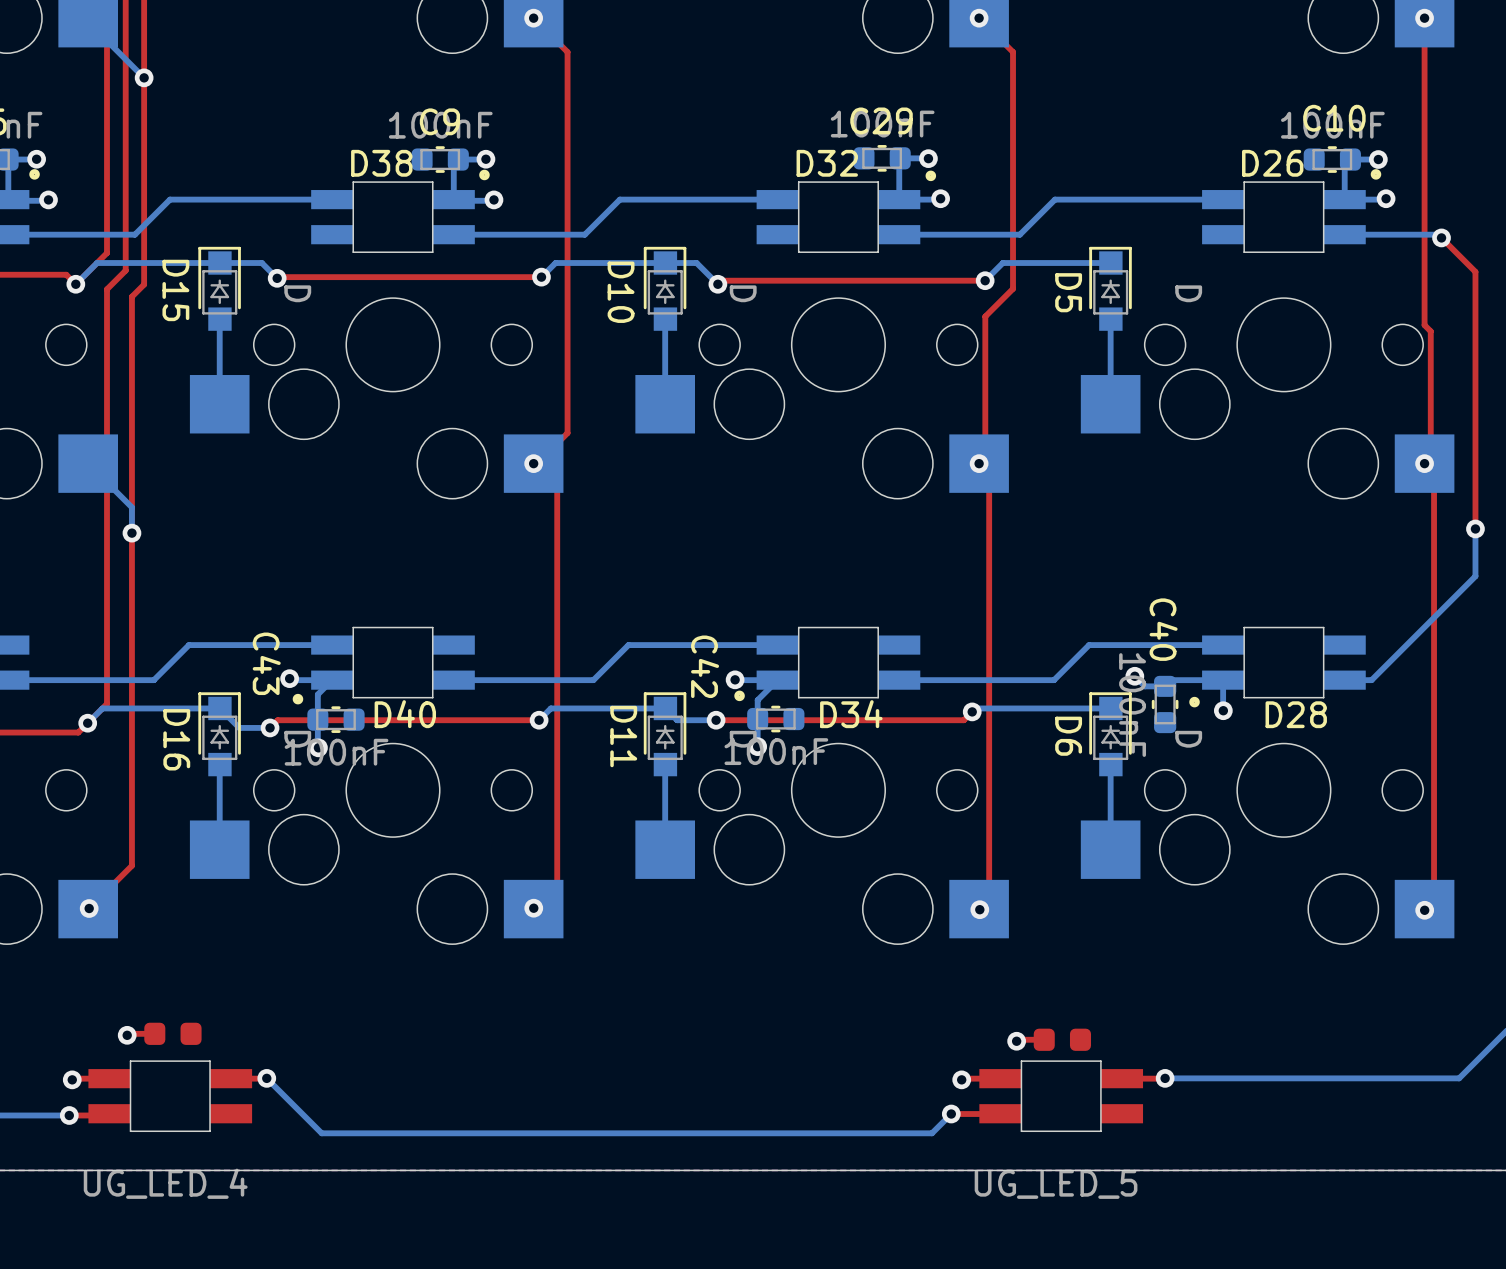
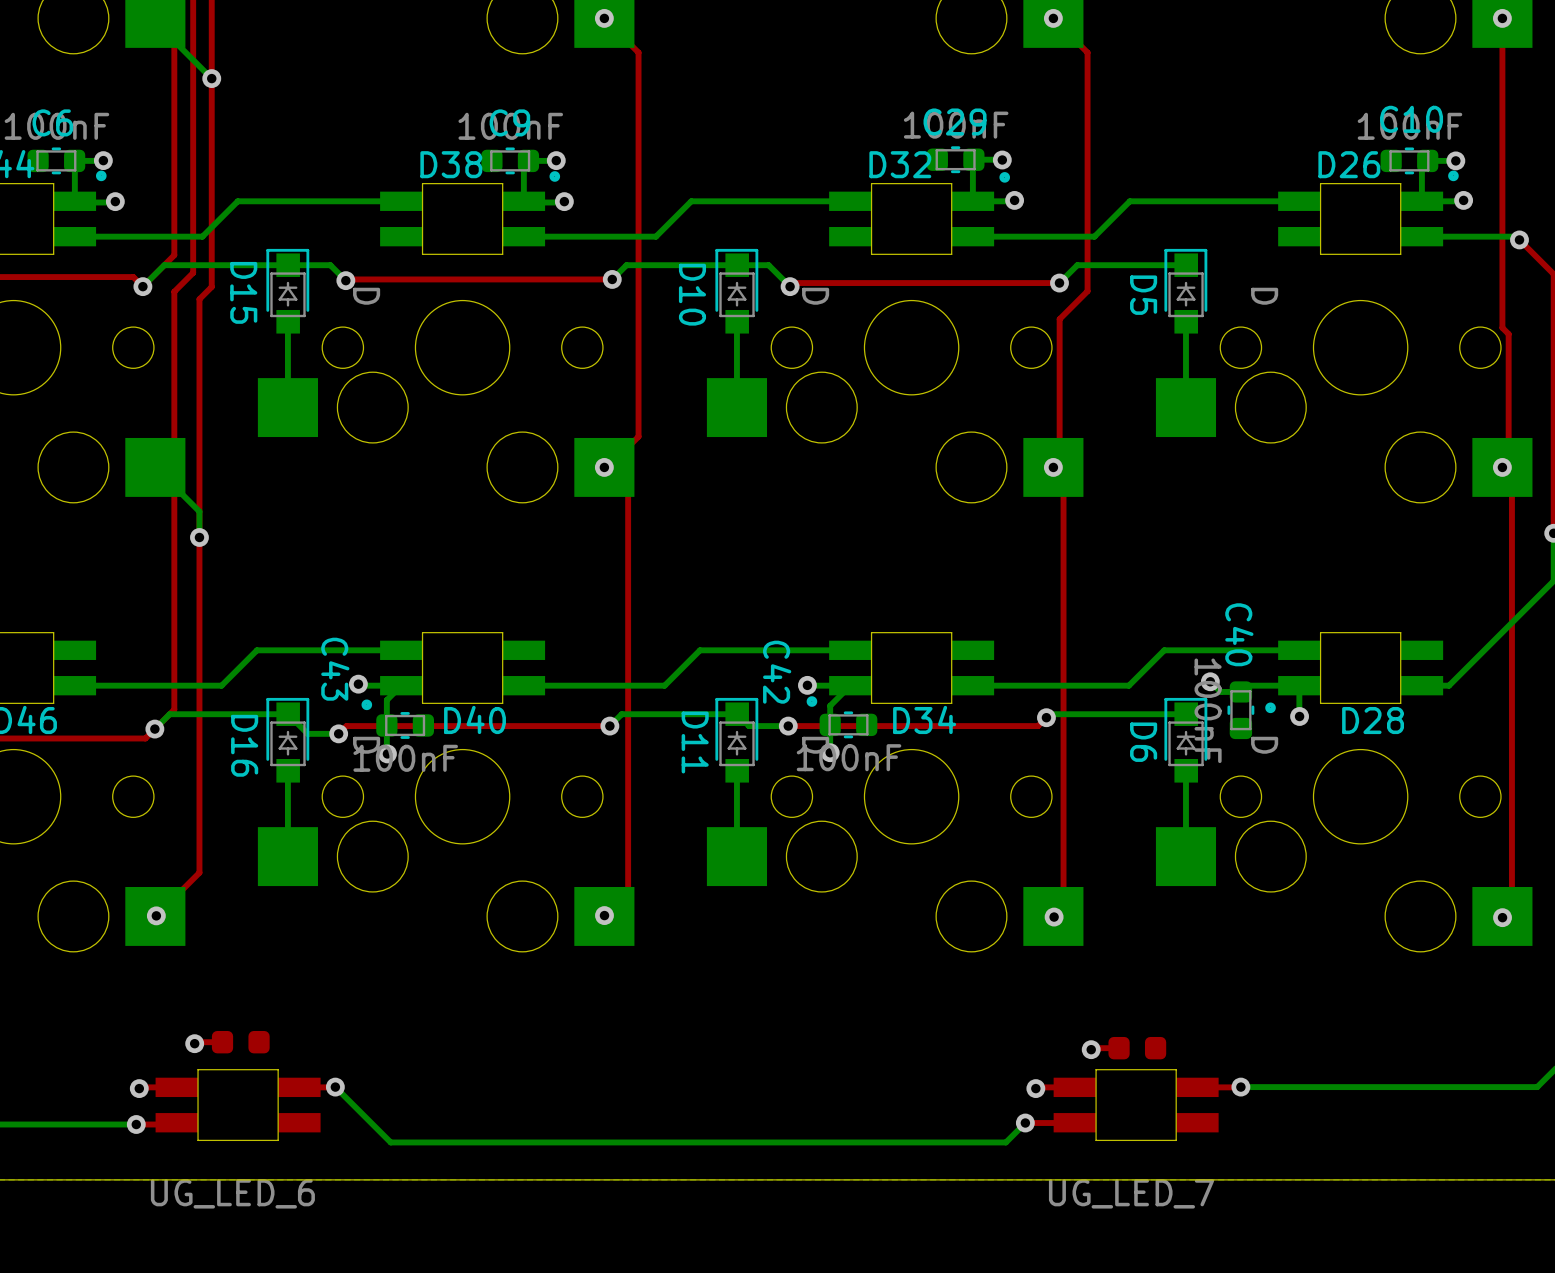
part value: UG_LED_4 (165, 1183) -> UG_LED_6 (232, 1193)
part value: UG_LED_5 (1056, 1184) -> UG_LED_7 (1131, 1193)

